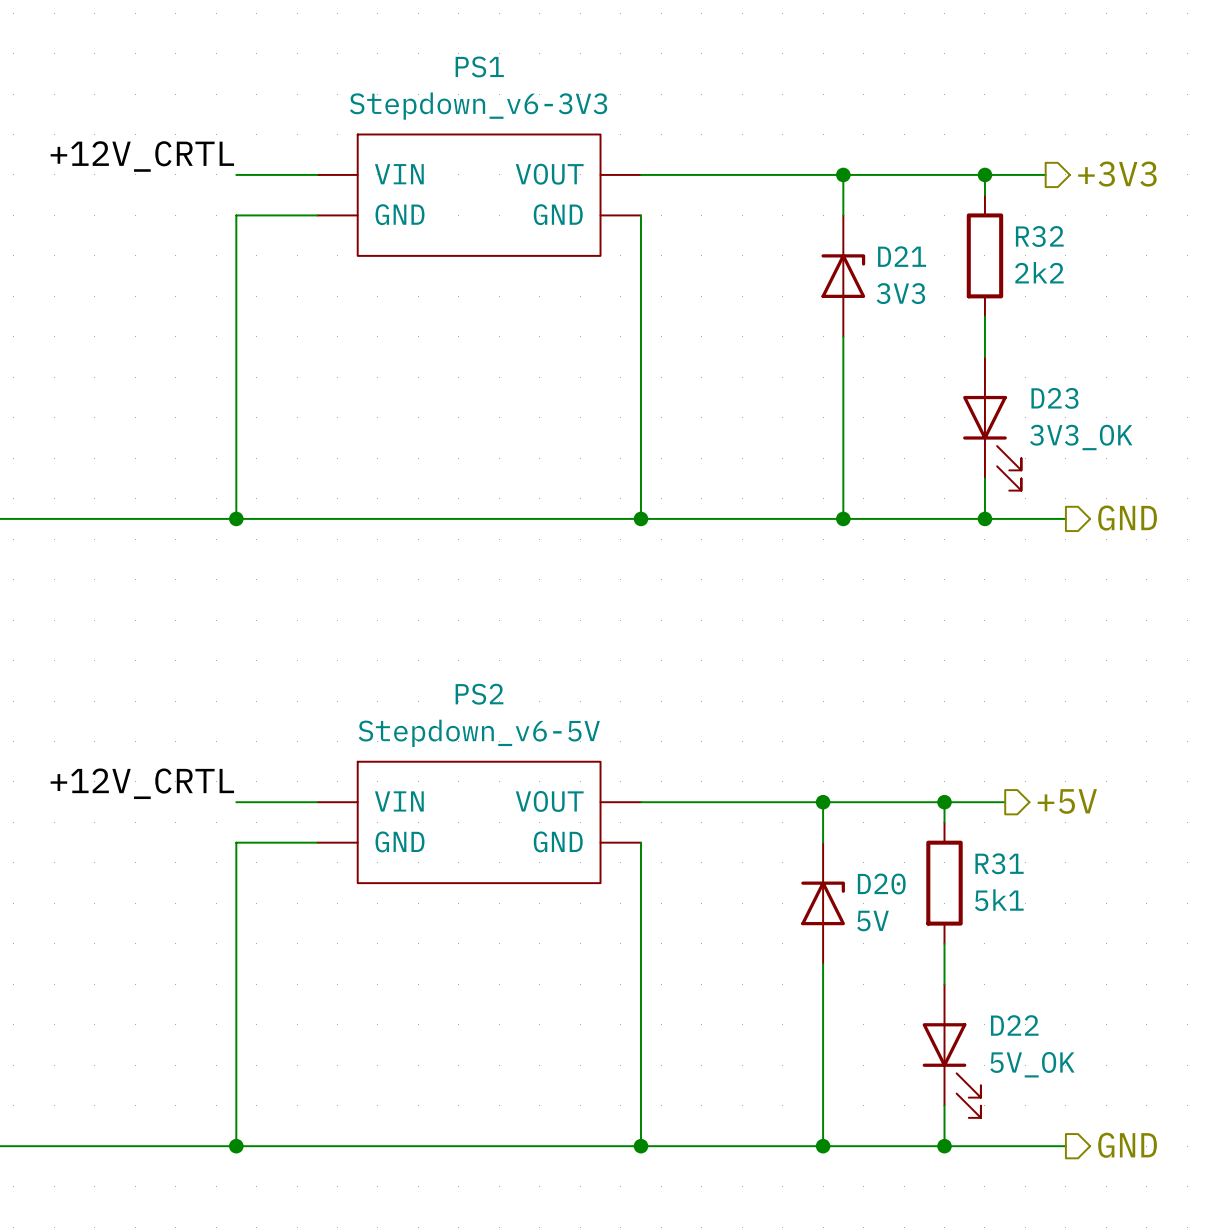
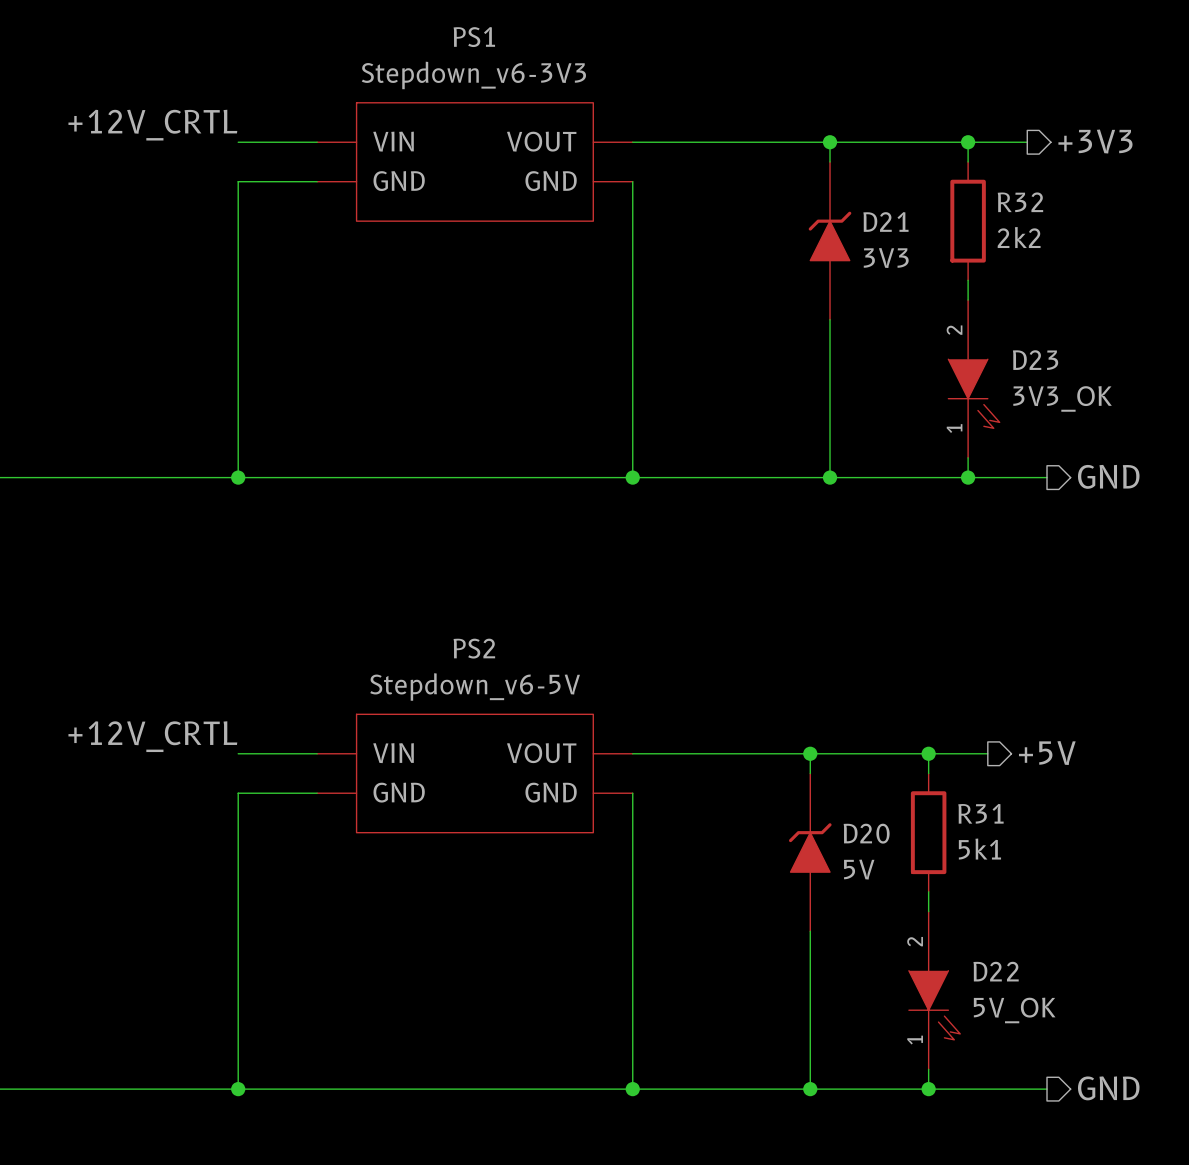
D21 symbol: [821, 215, 866, 337] -> [808, 161, 852, 320]
D23 symbol: [963, 357, 1022, 491] -> [948, 300, 1000, 458]
D20 symbol: [801, 842, 845, 965] -> [788, 773, 832, 932]
D22 symbol: [922, 984, 981, 1118] -> [908, 911, 961, 1070]

